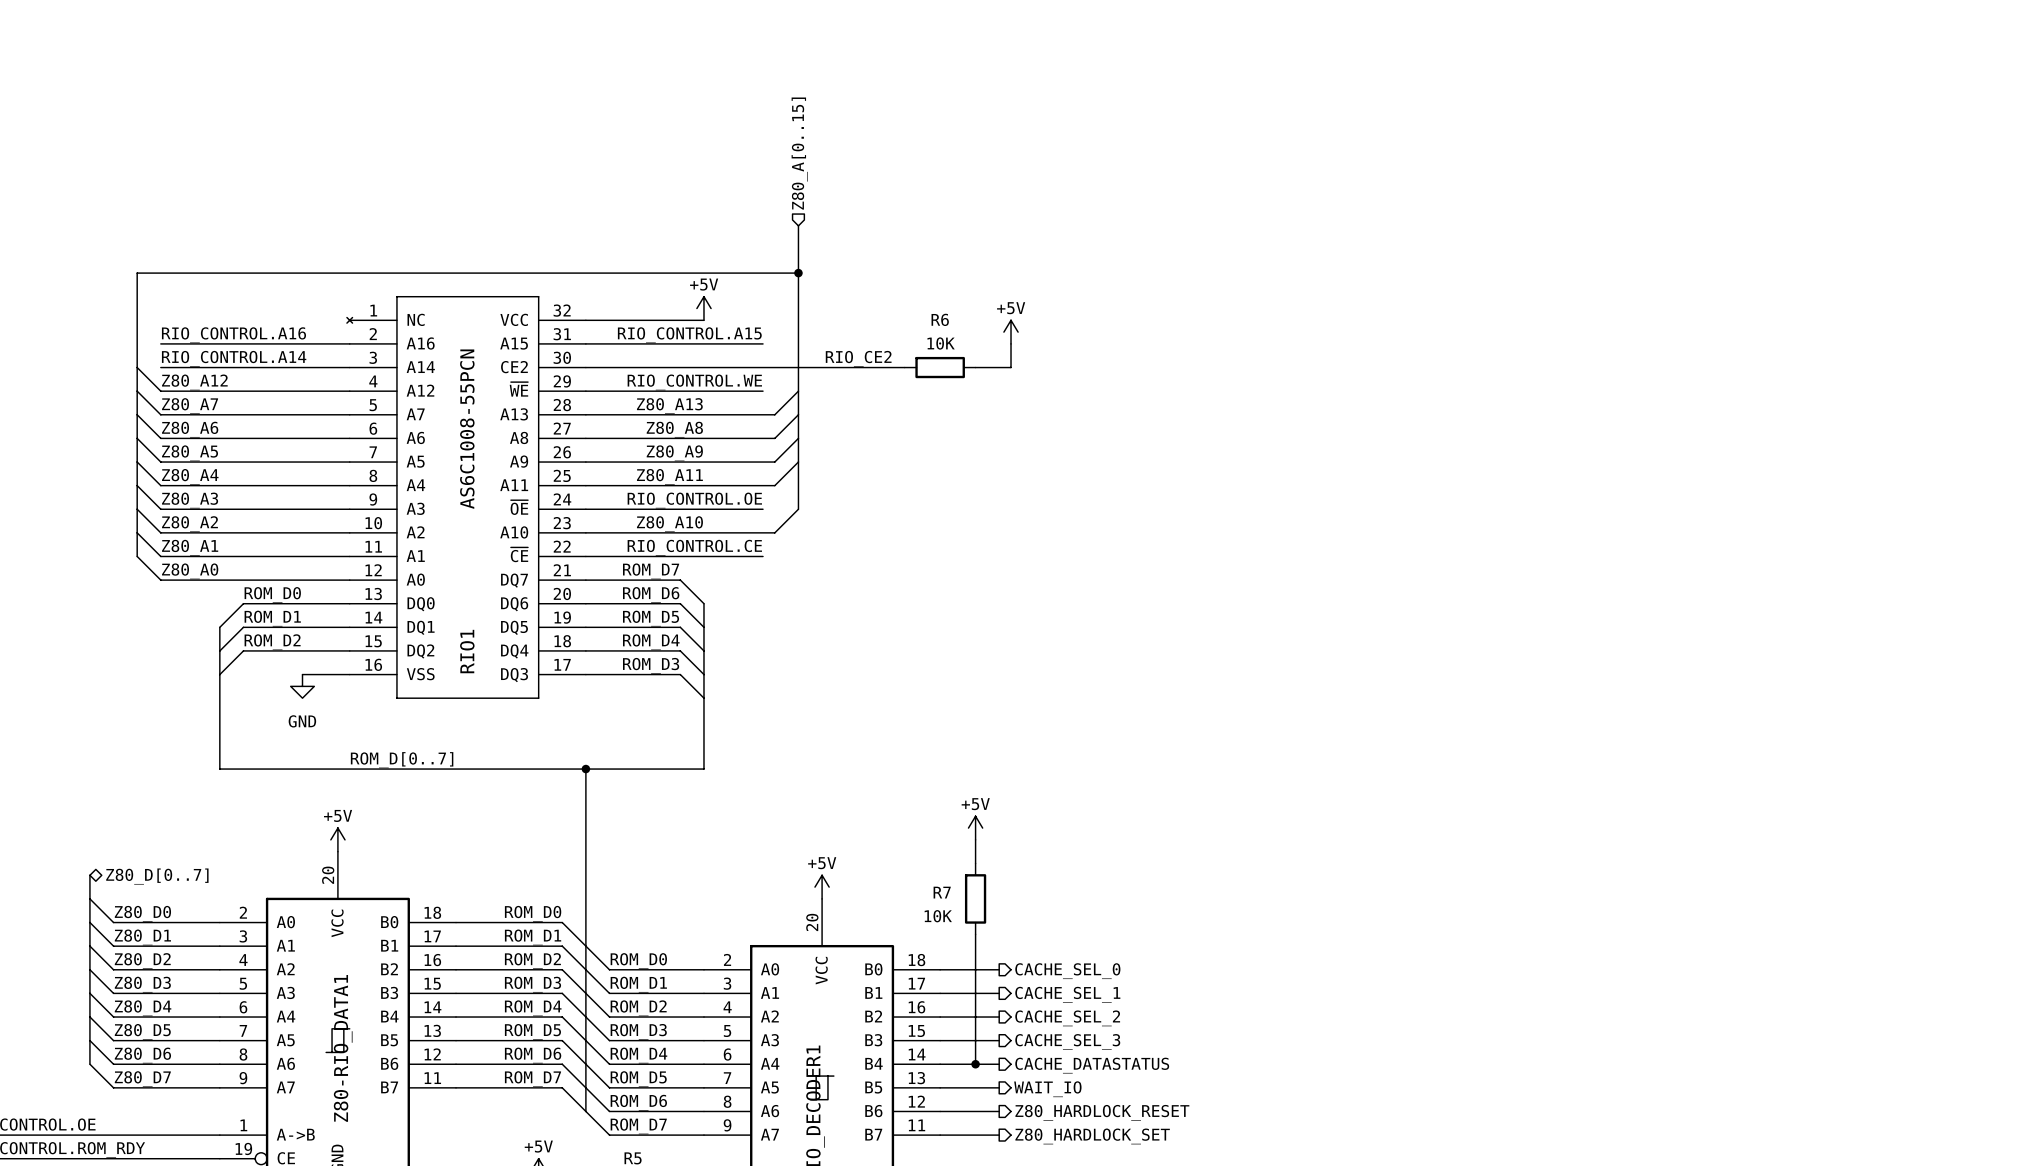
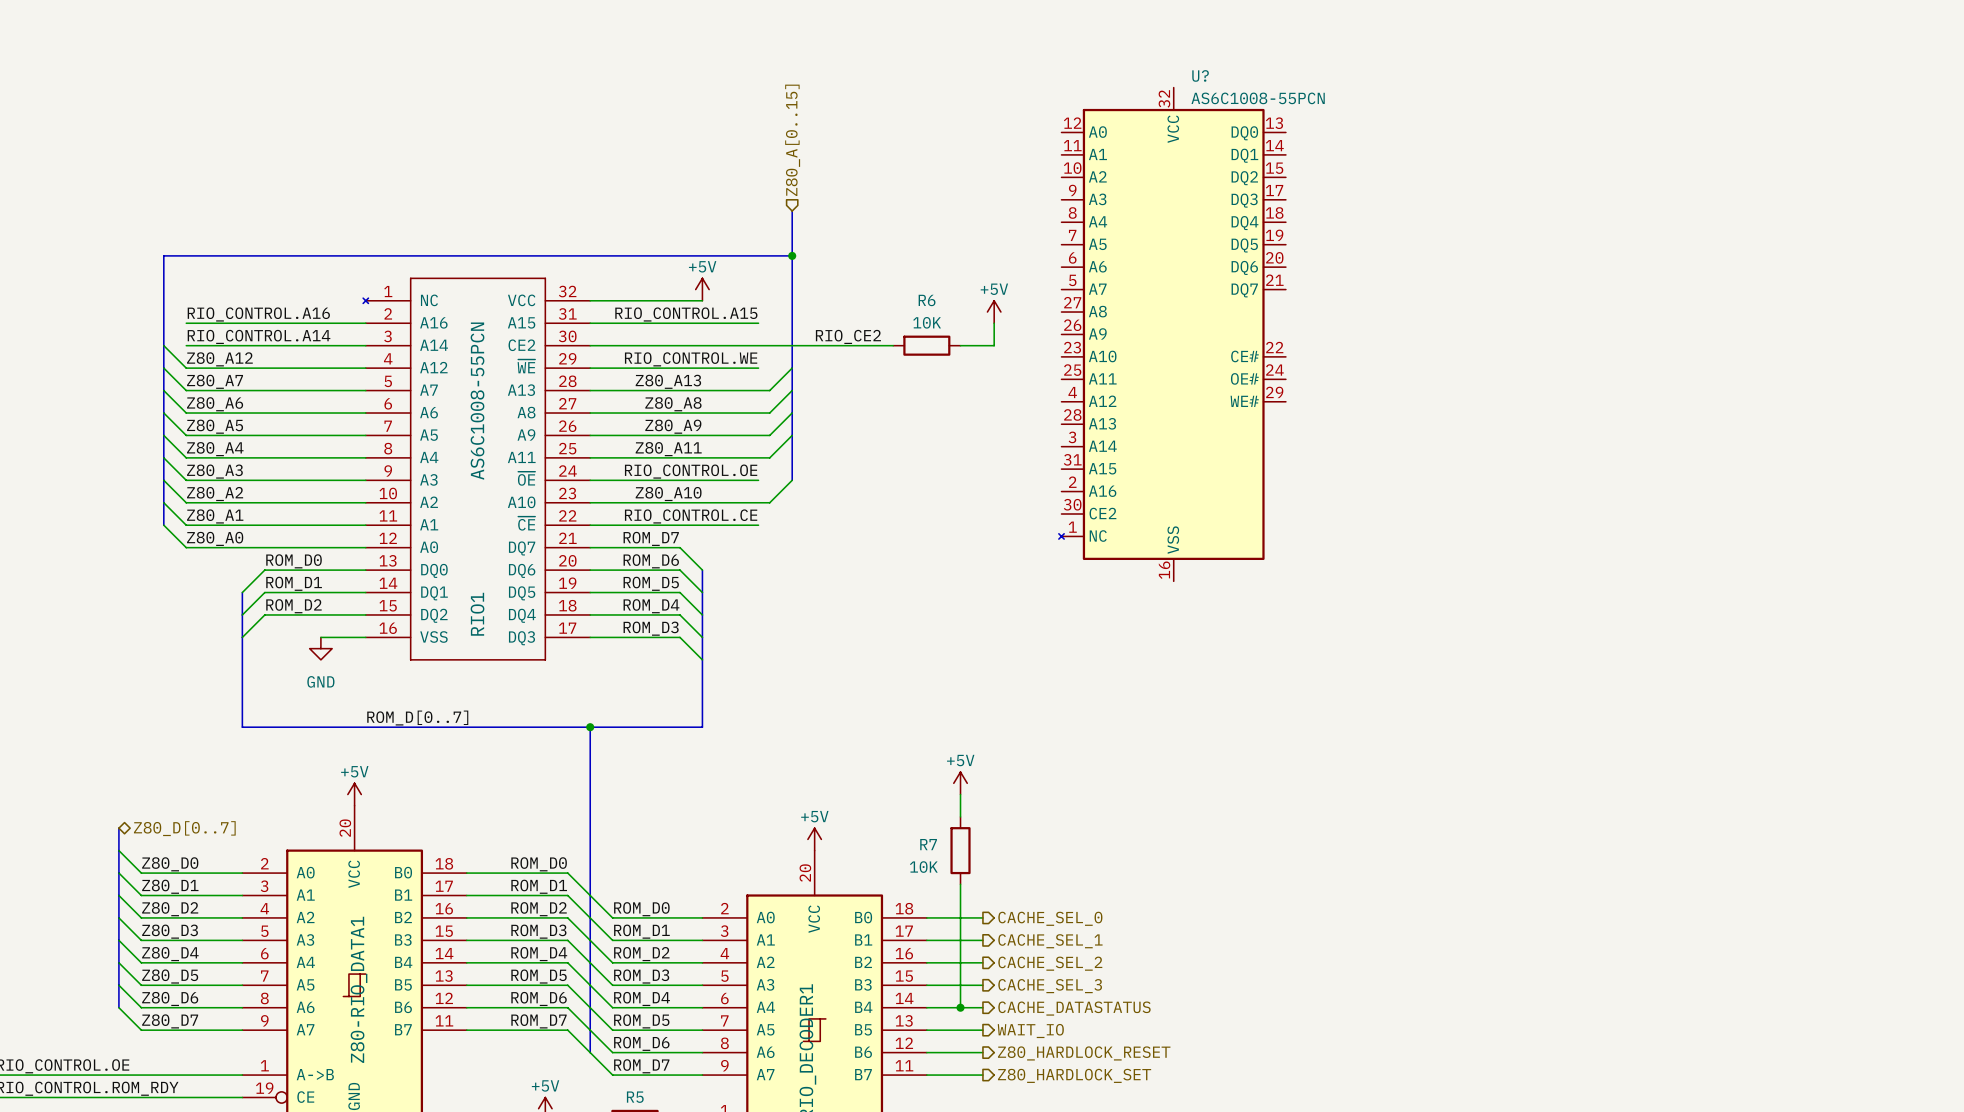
U?: none -> AS6C1008-55PCN (1172, 334)

